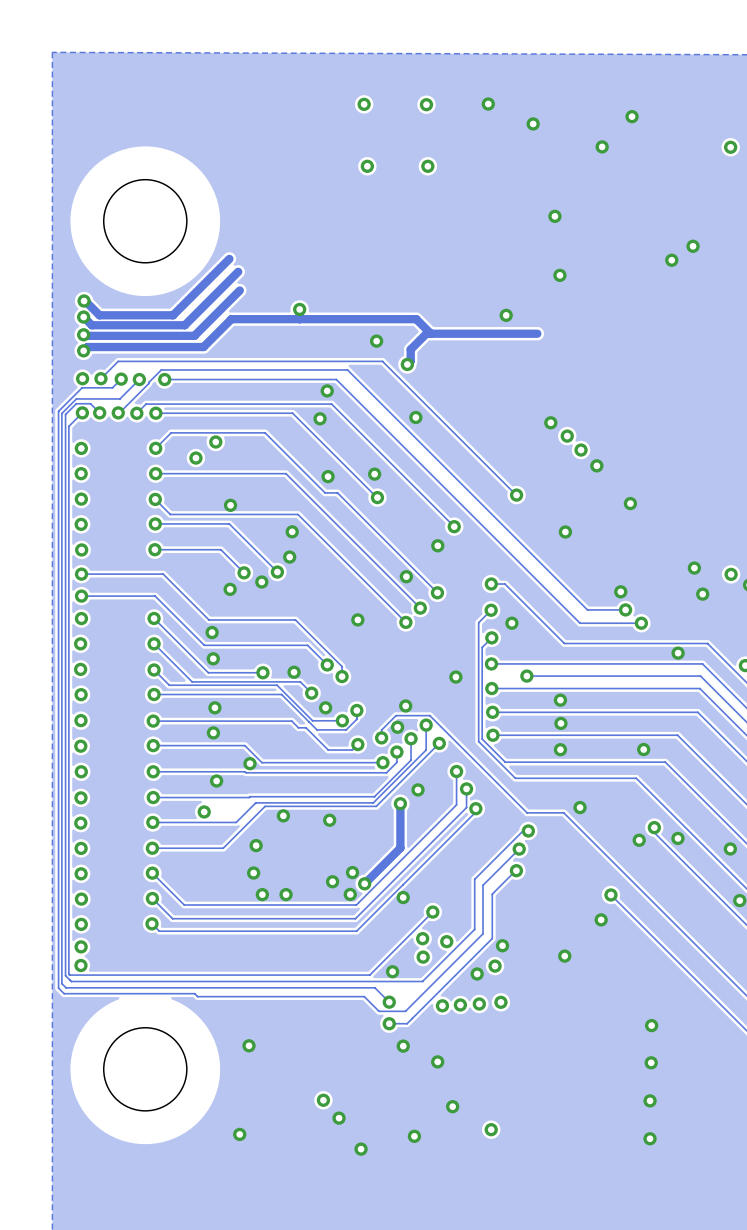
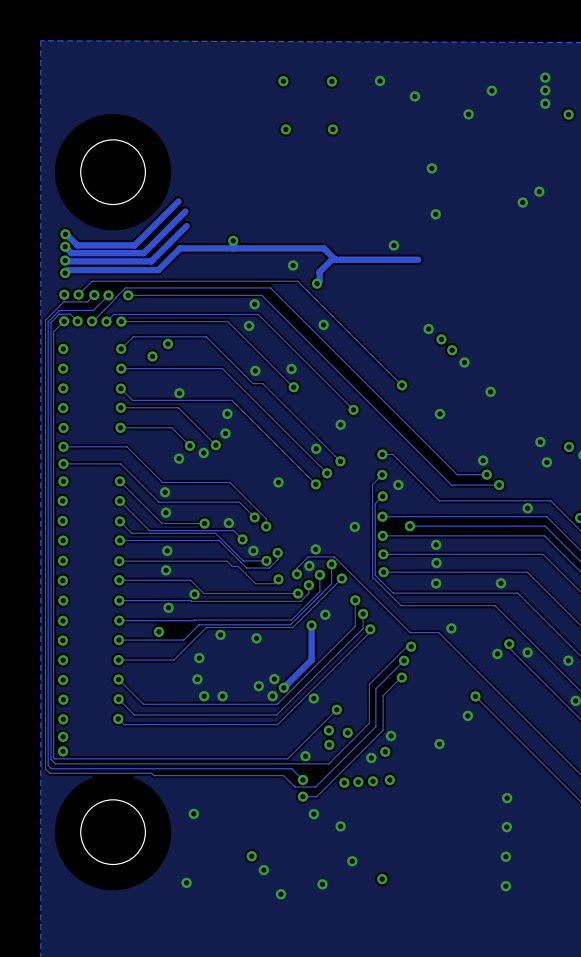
via: none -> (545, 77)
via: none -> (545, 90)
via: none -> (545, 103)

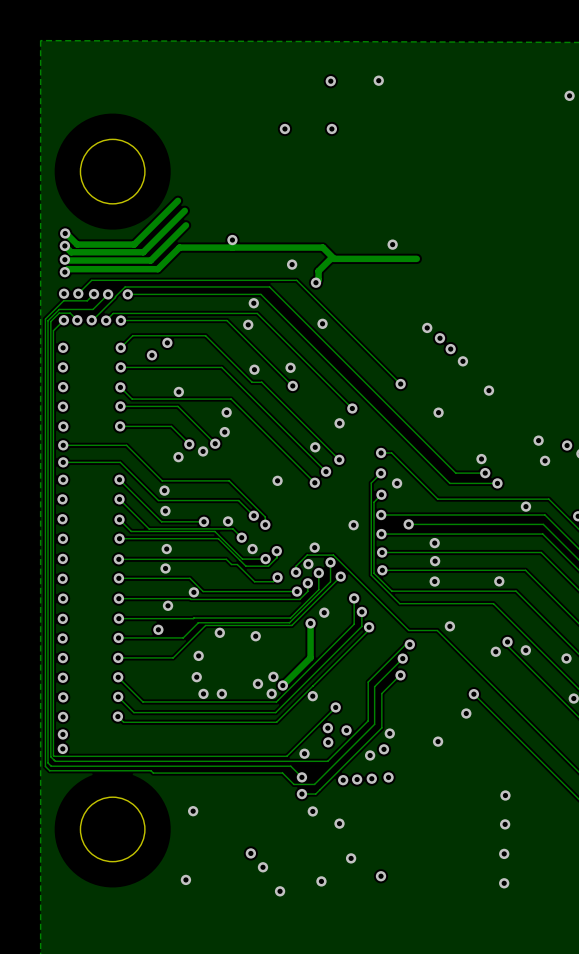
via: (545, 77) -> none
via: (283, 81) -> none
via: (491, 90) -> none
via: (545, 90) -> none
via: (414, 96) -> none
via: none -> (569, 95)
via: (545, 103) -> none
via: (468, 114) -> none
via: (568, 114) -> none
via: (431, 168) -> none
via: (539, 191) -> none
via: (522, 202) -> none
via: (435, 214) -> none

